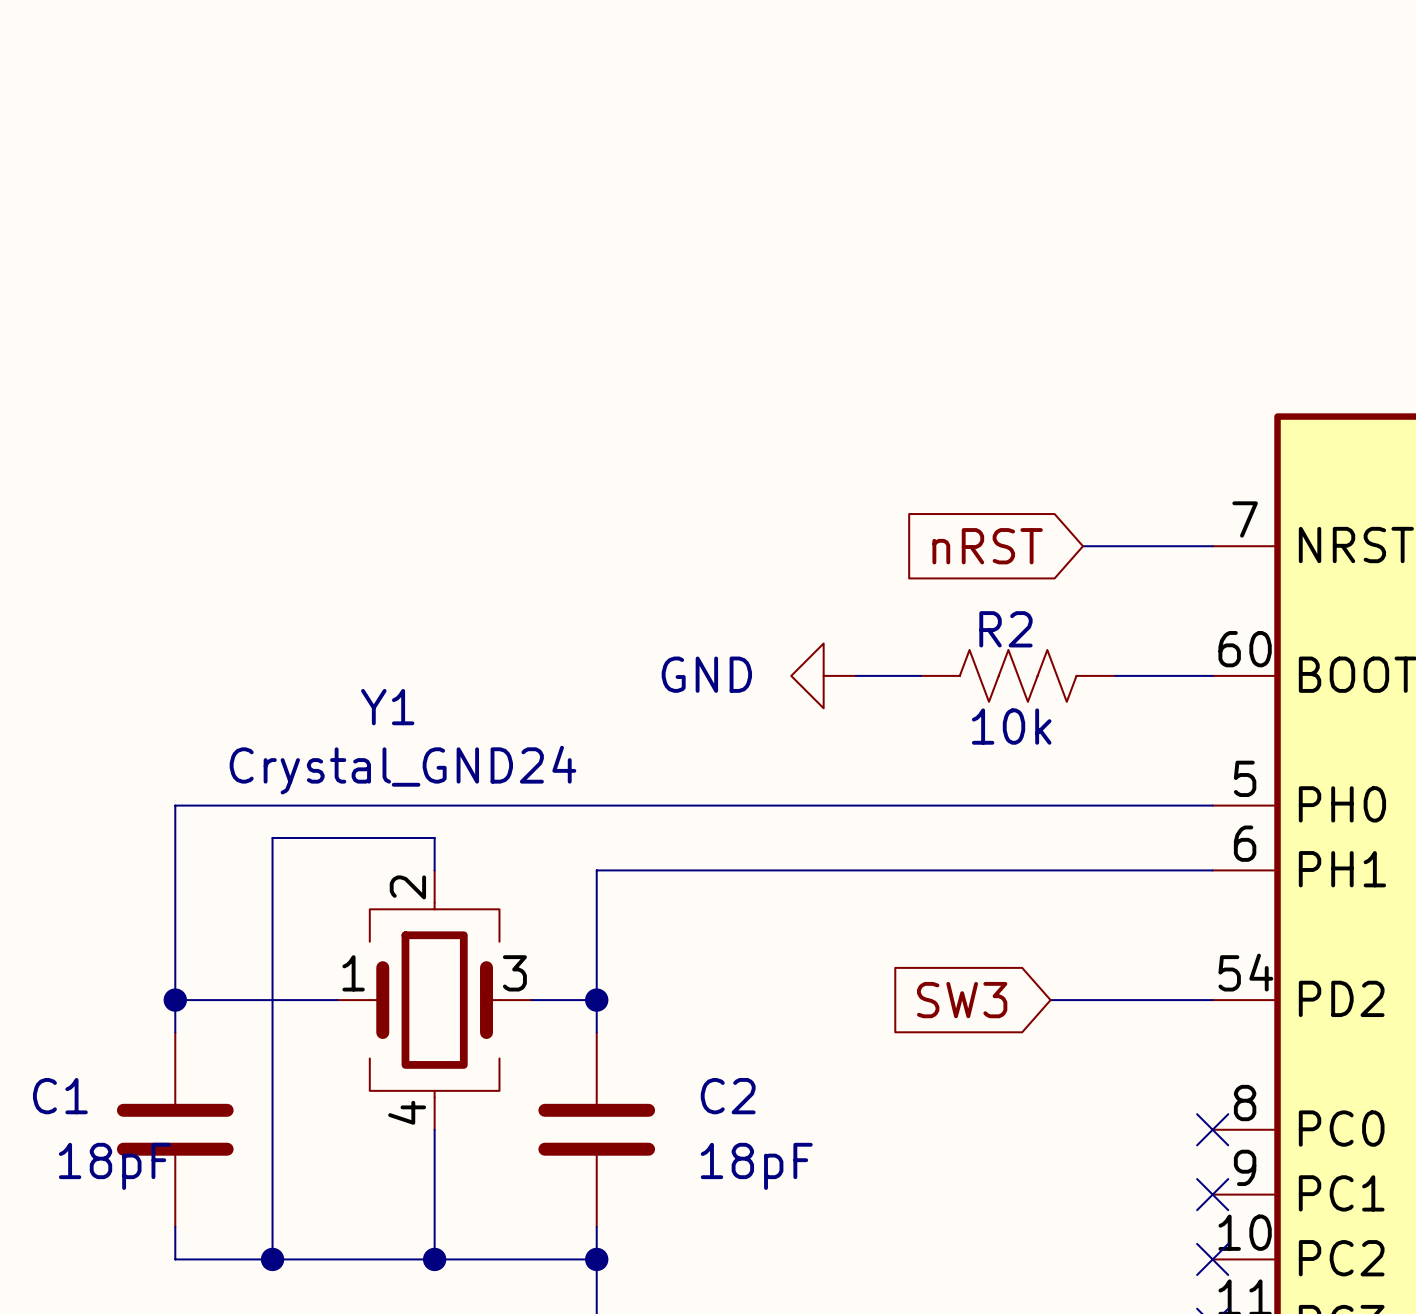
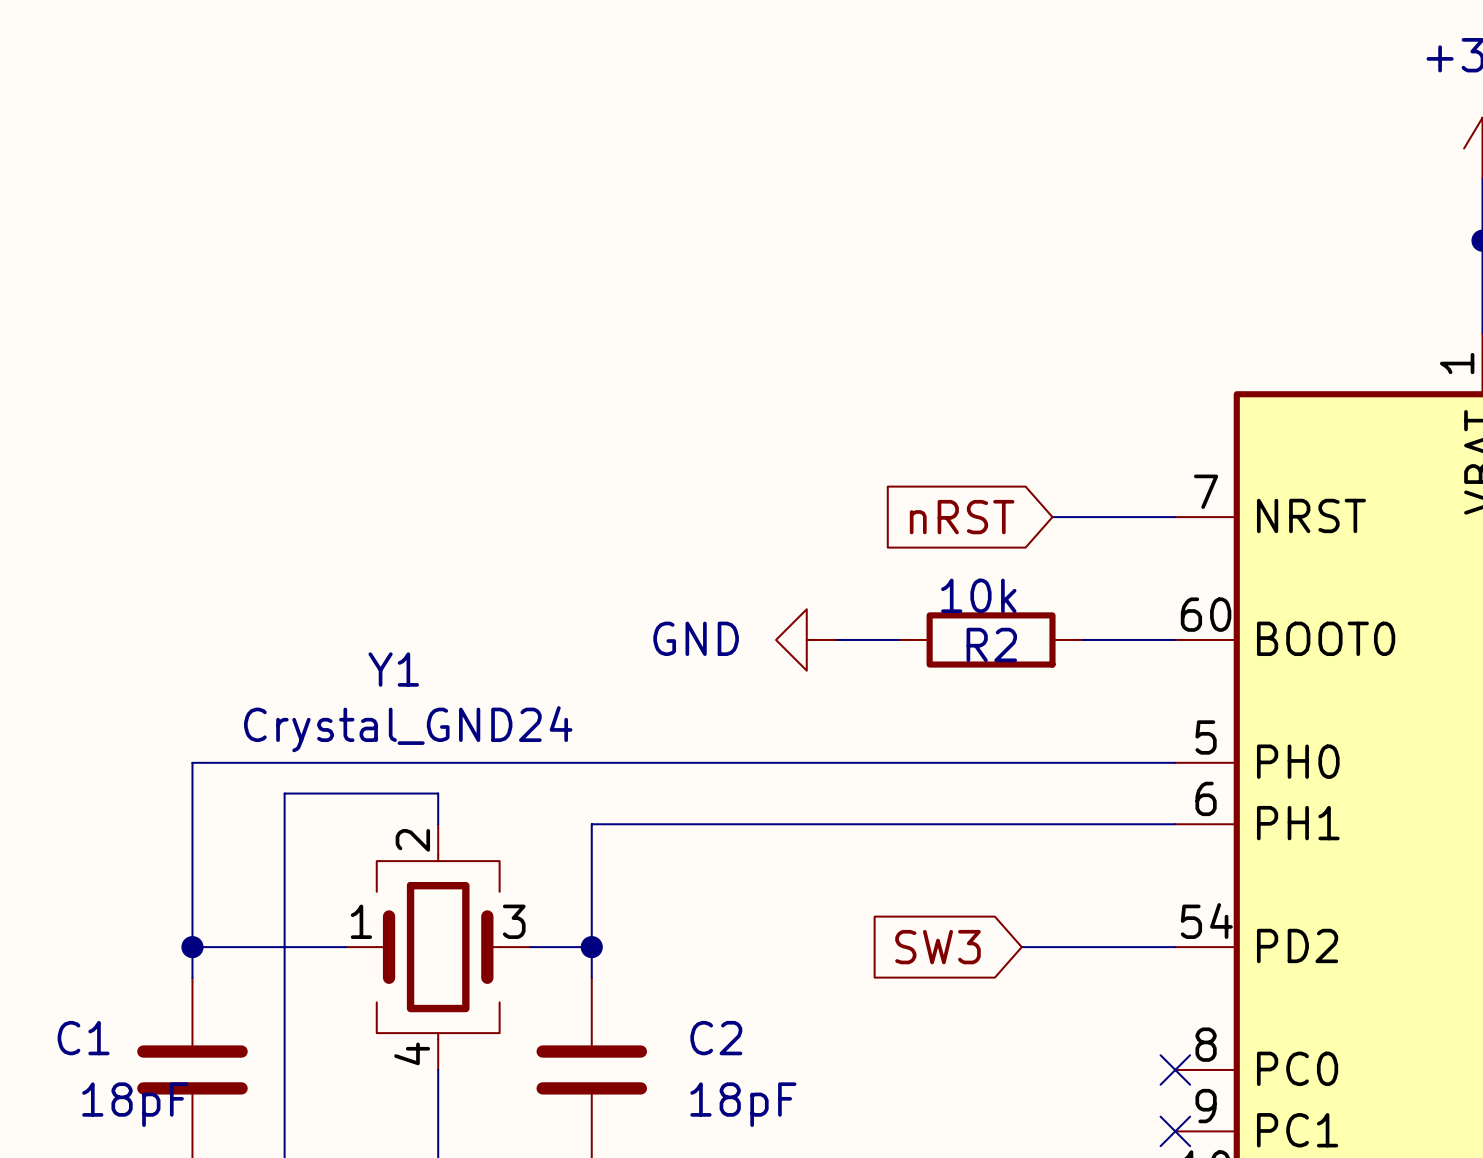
R2 name position: R2 (1005, 629) -> R2 (991, 644)
R2 symbol: [920, 649, 1116, 702] -> [898, 612, 1084, 668]
R2 value position: 10k (1011, 726) -> 10k (978, 595)

